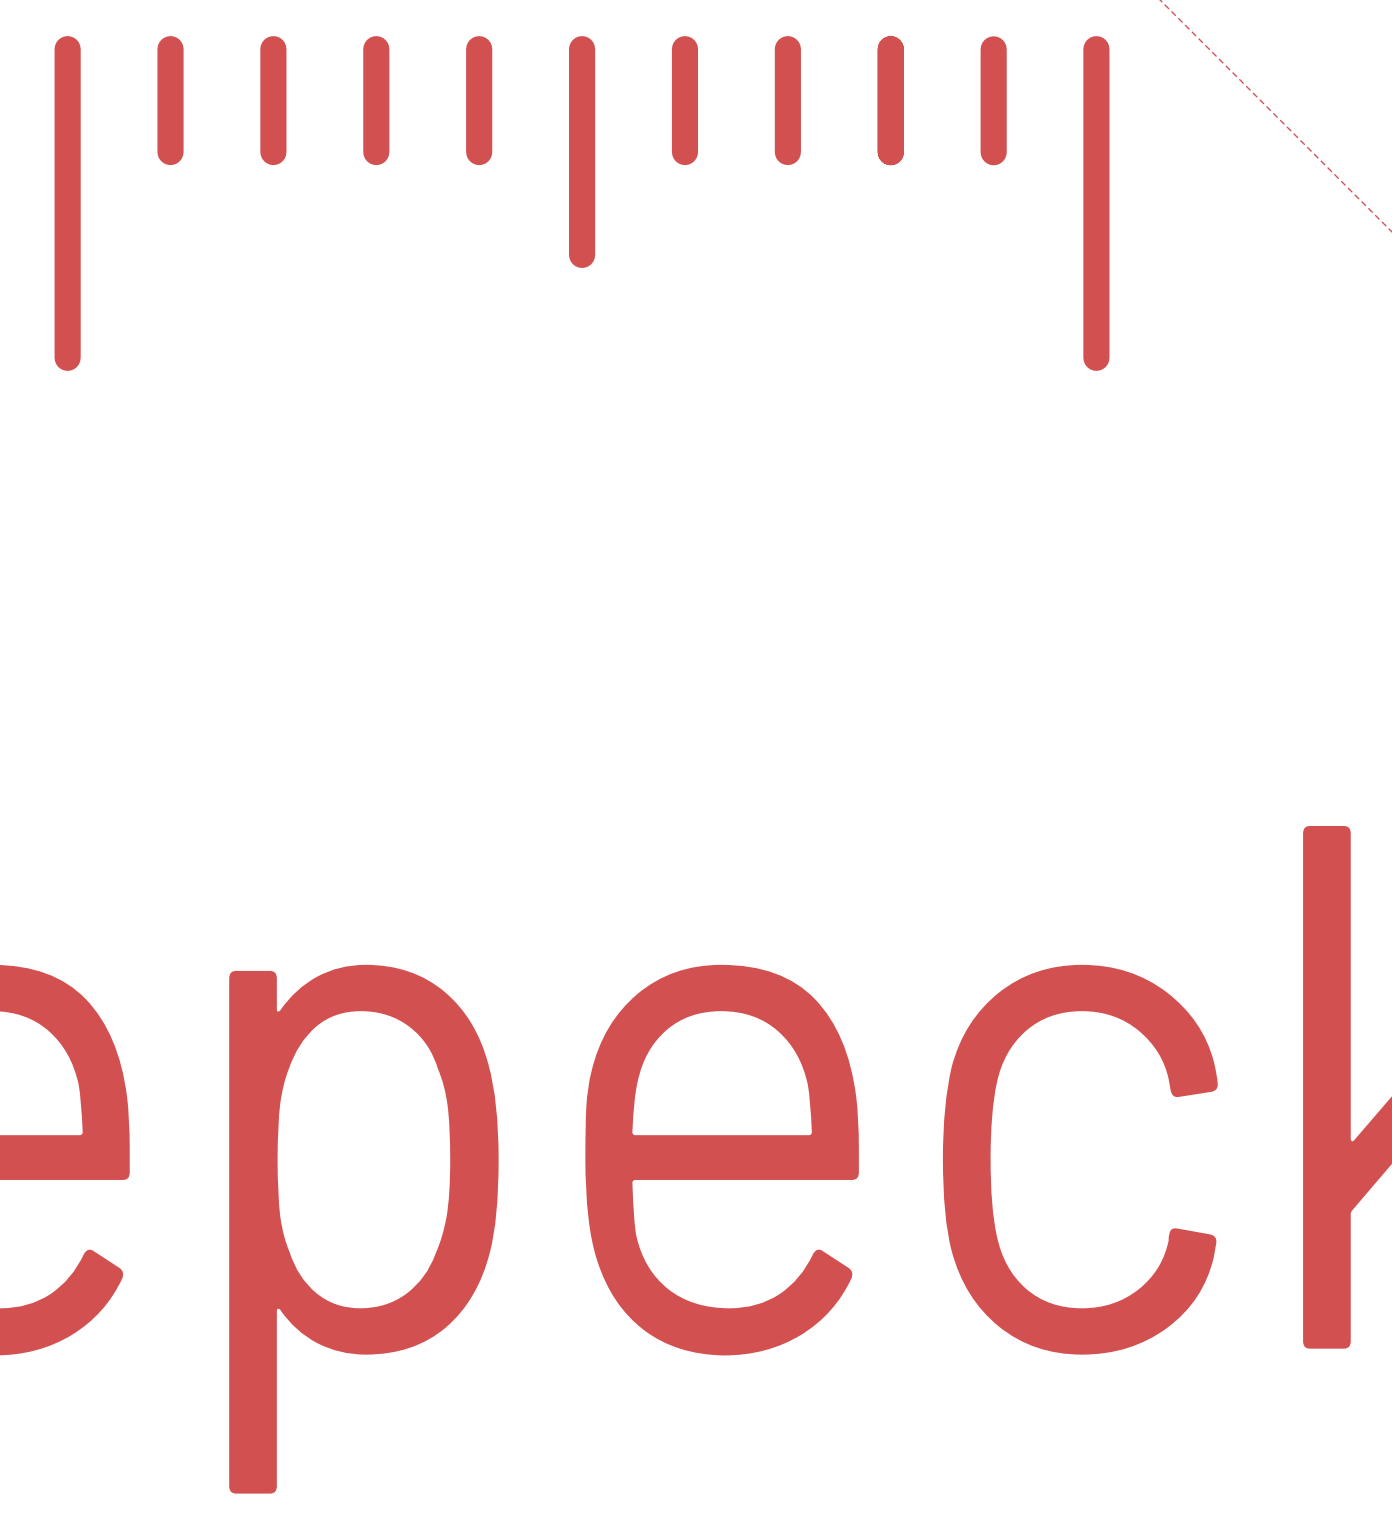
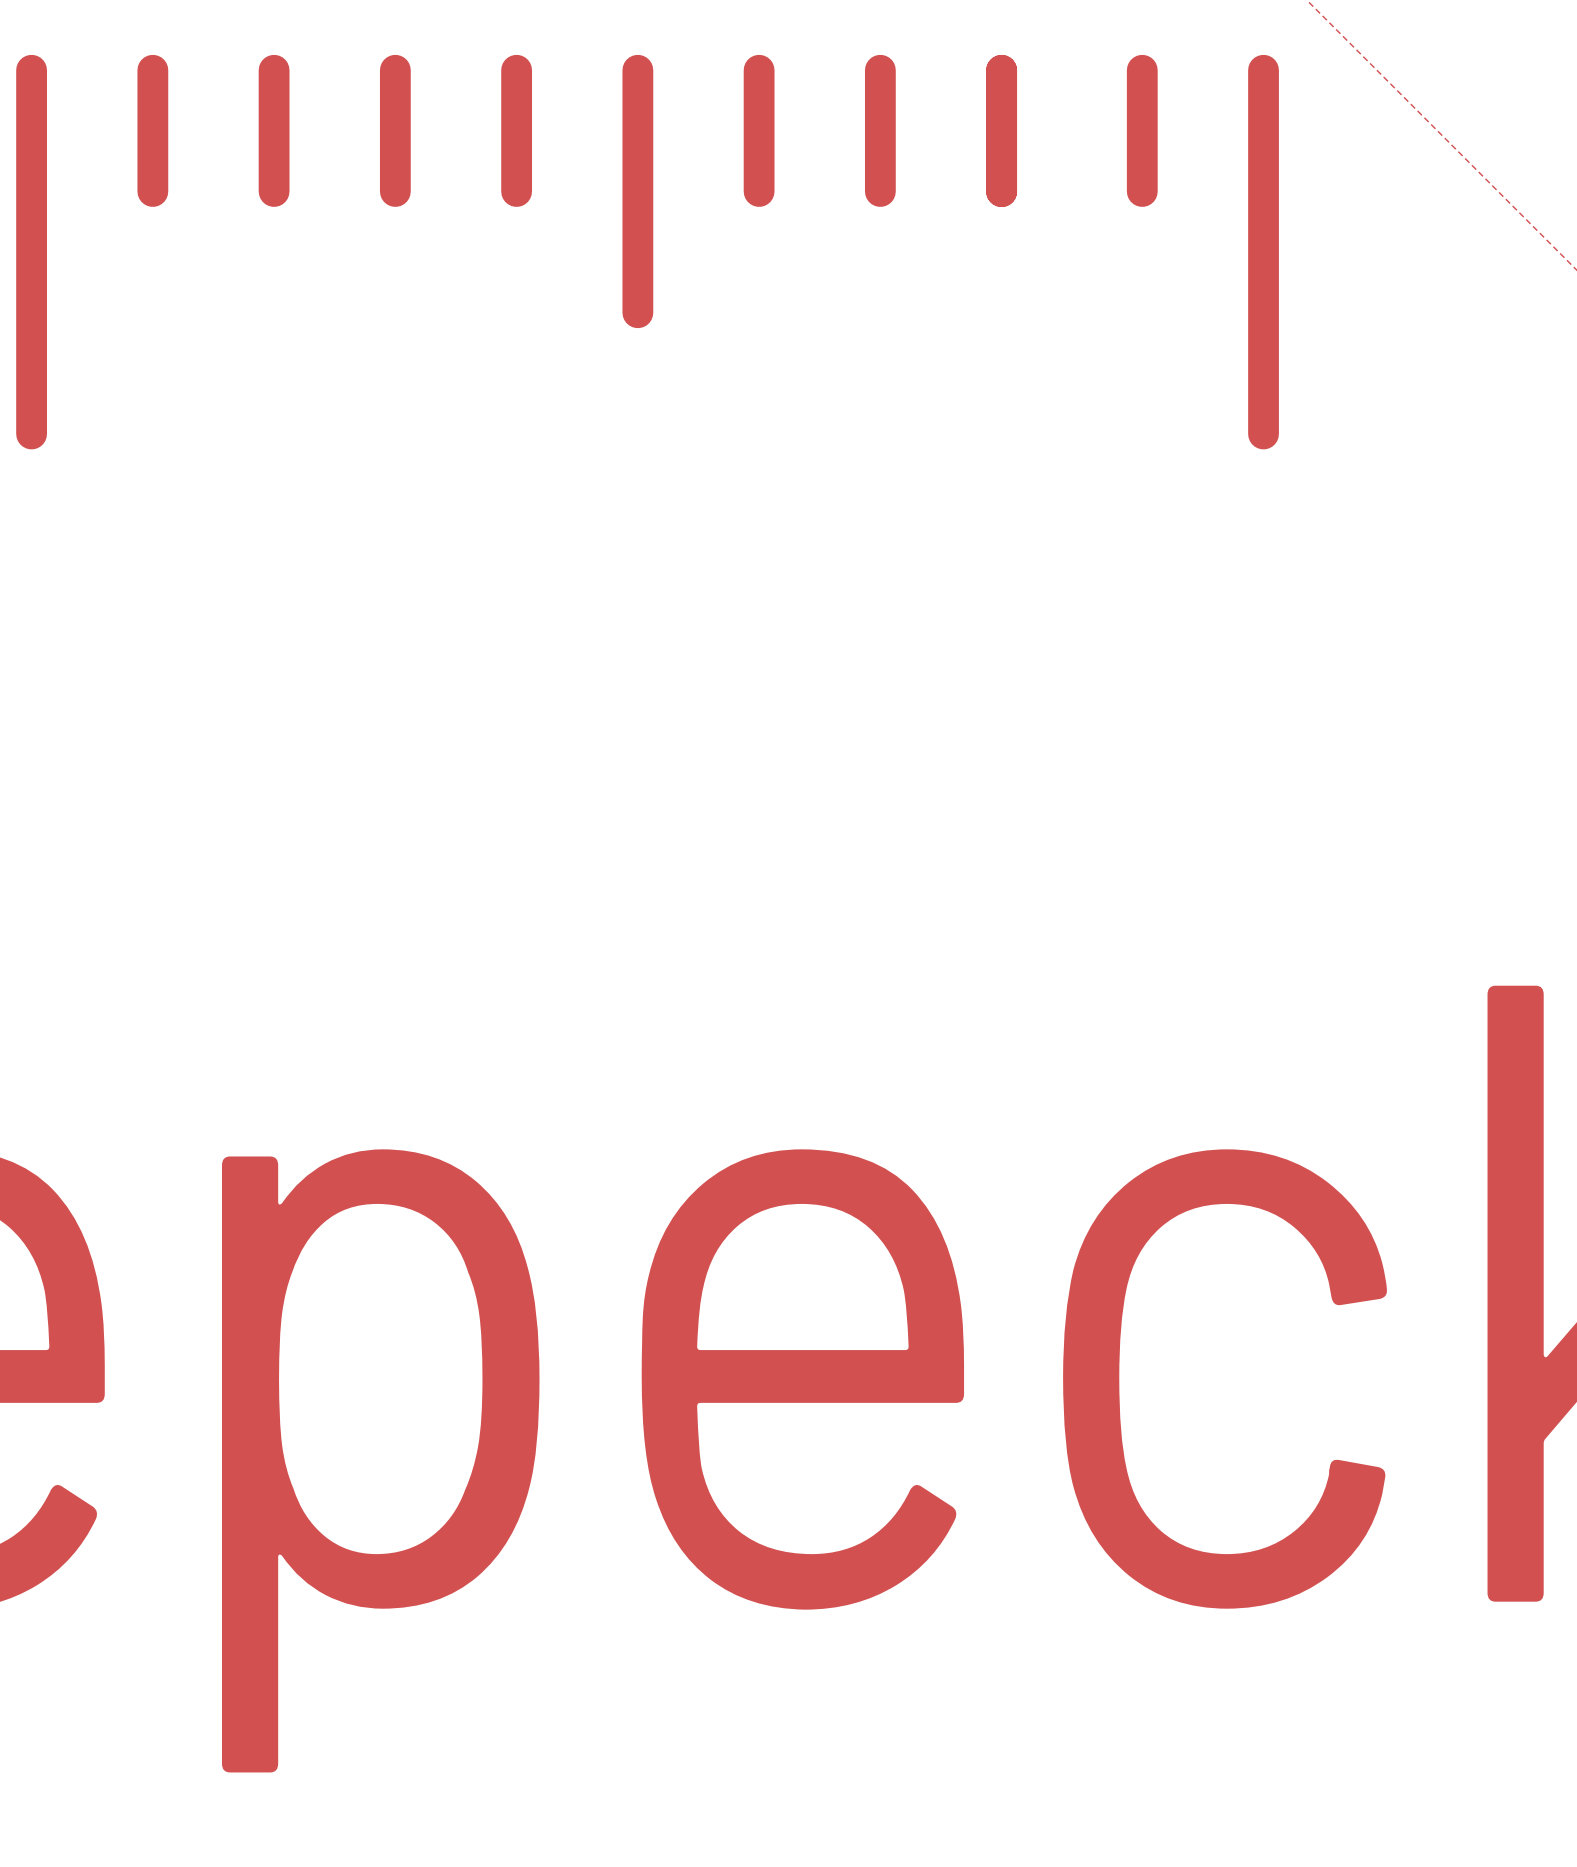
track: (993, 49) (993, 152) -> (1142, 70) (1142, 191)
track: (1096, 49) (1096, 357) -> (1263, 70) (1263, 434)

